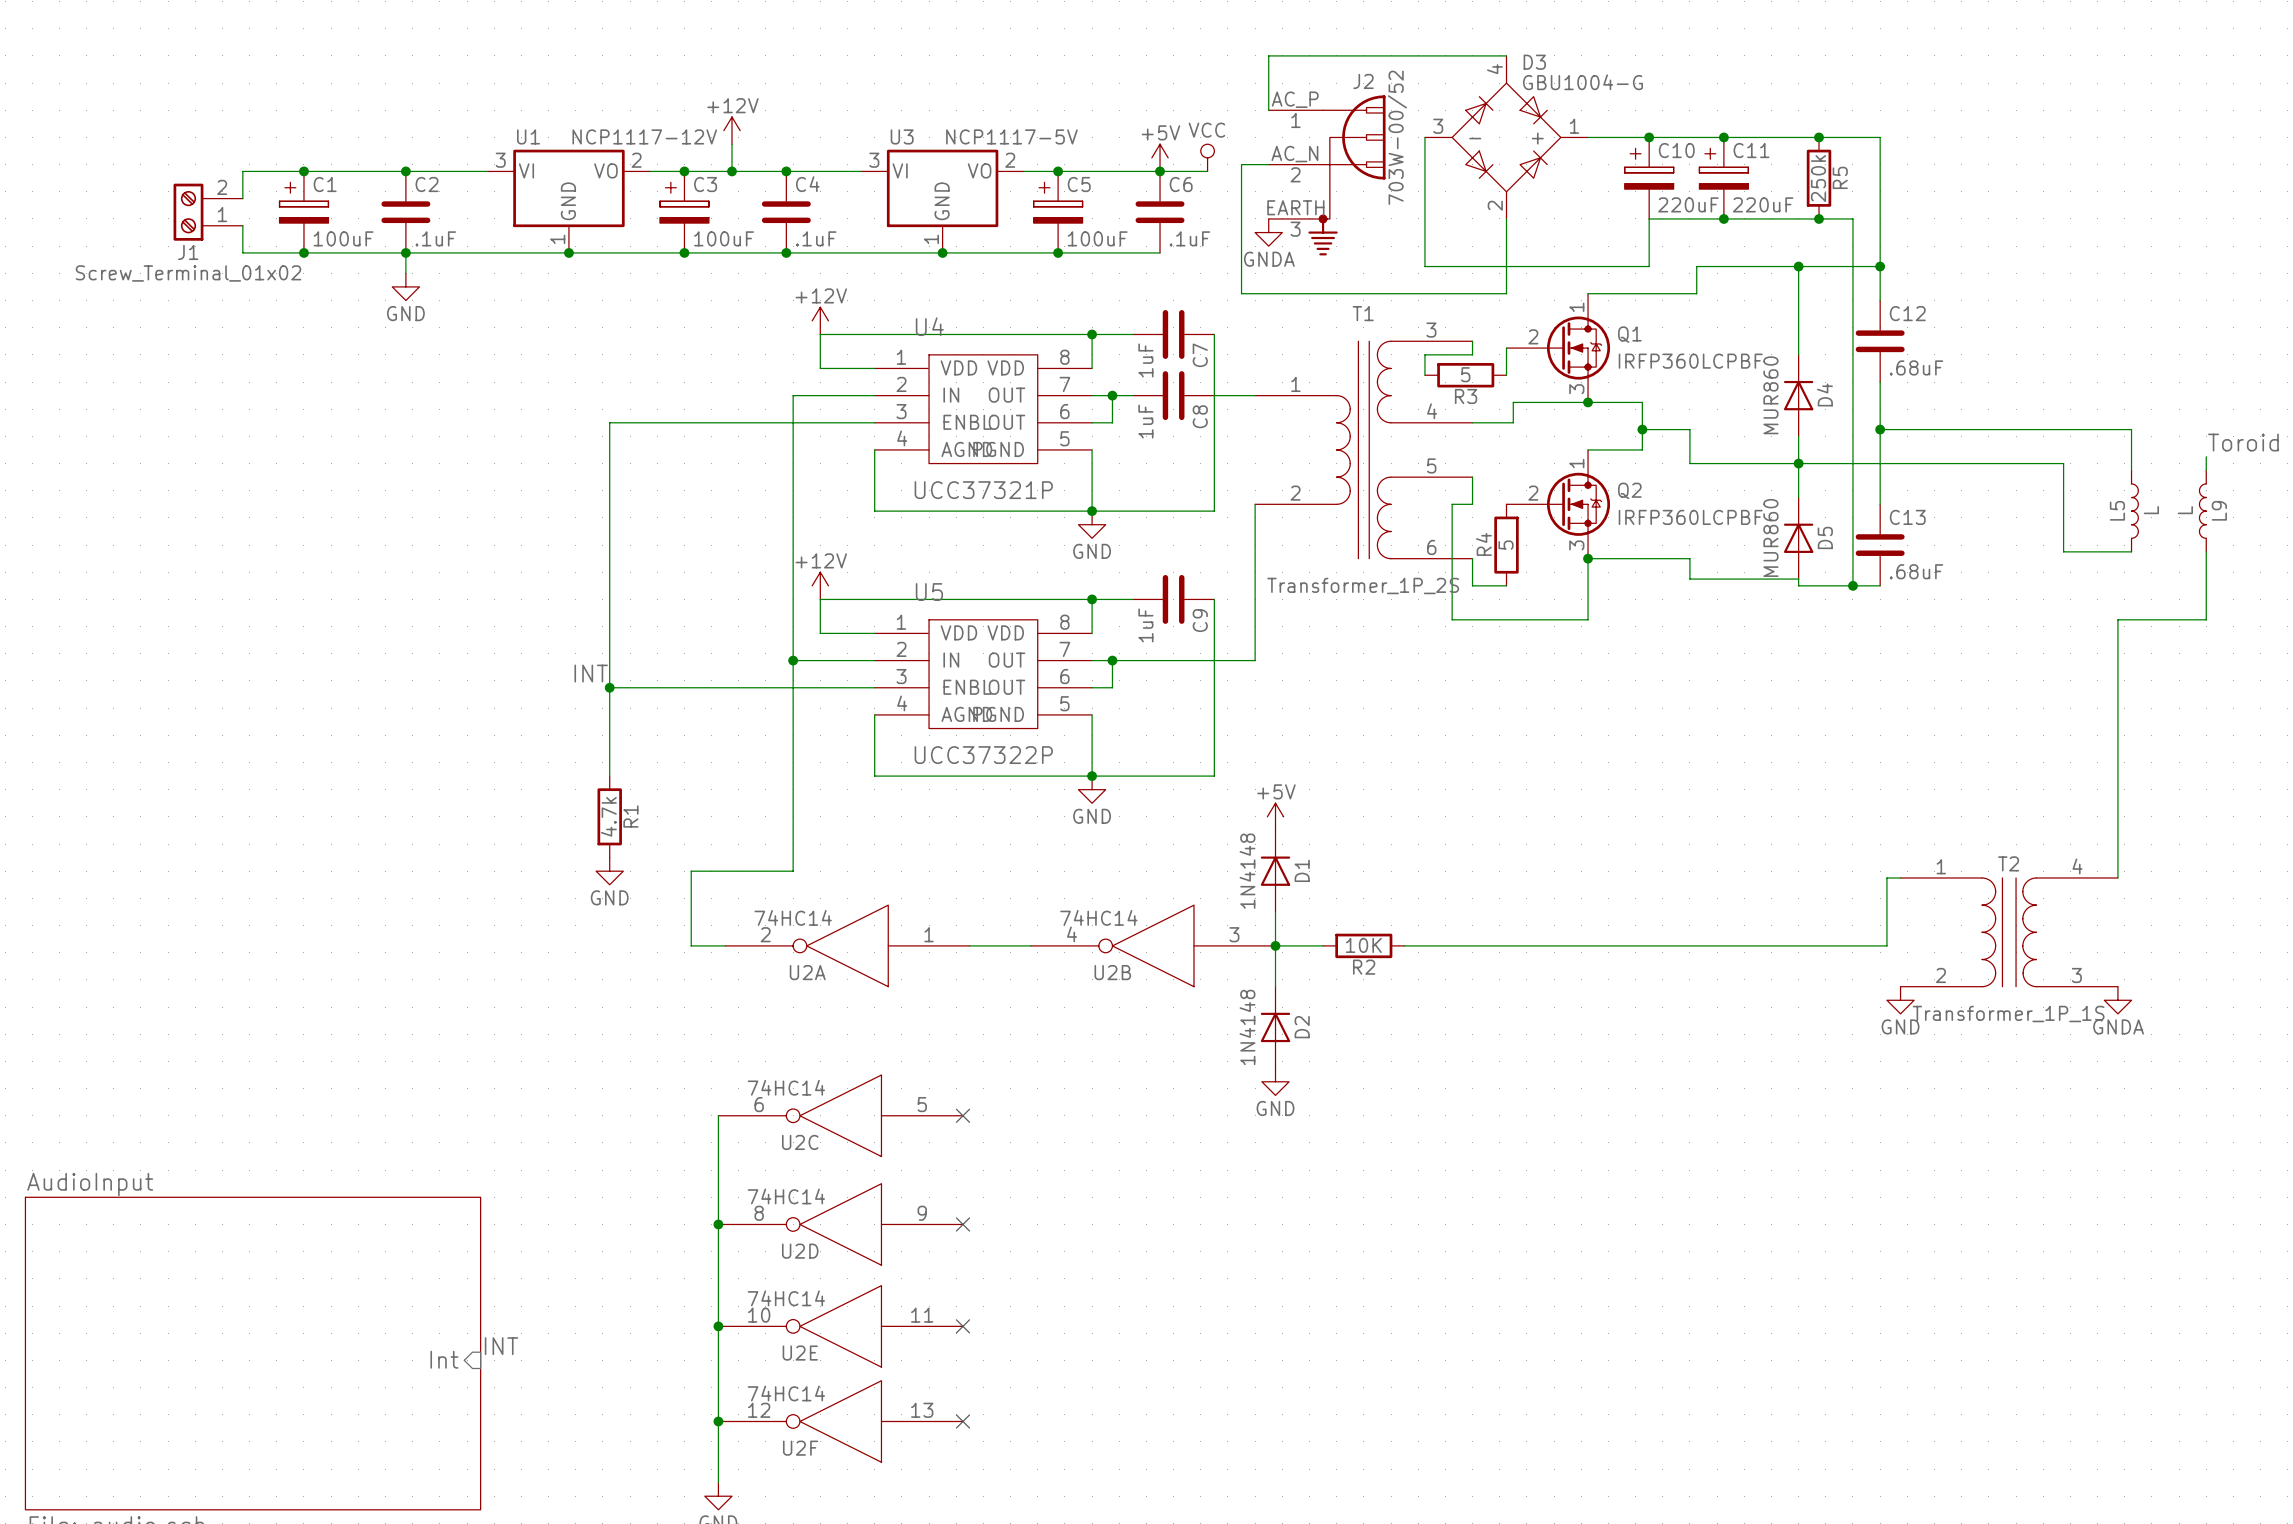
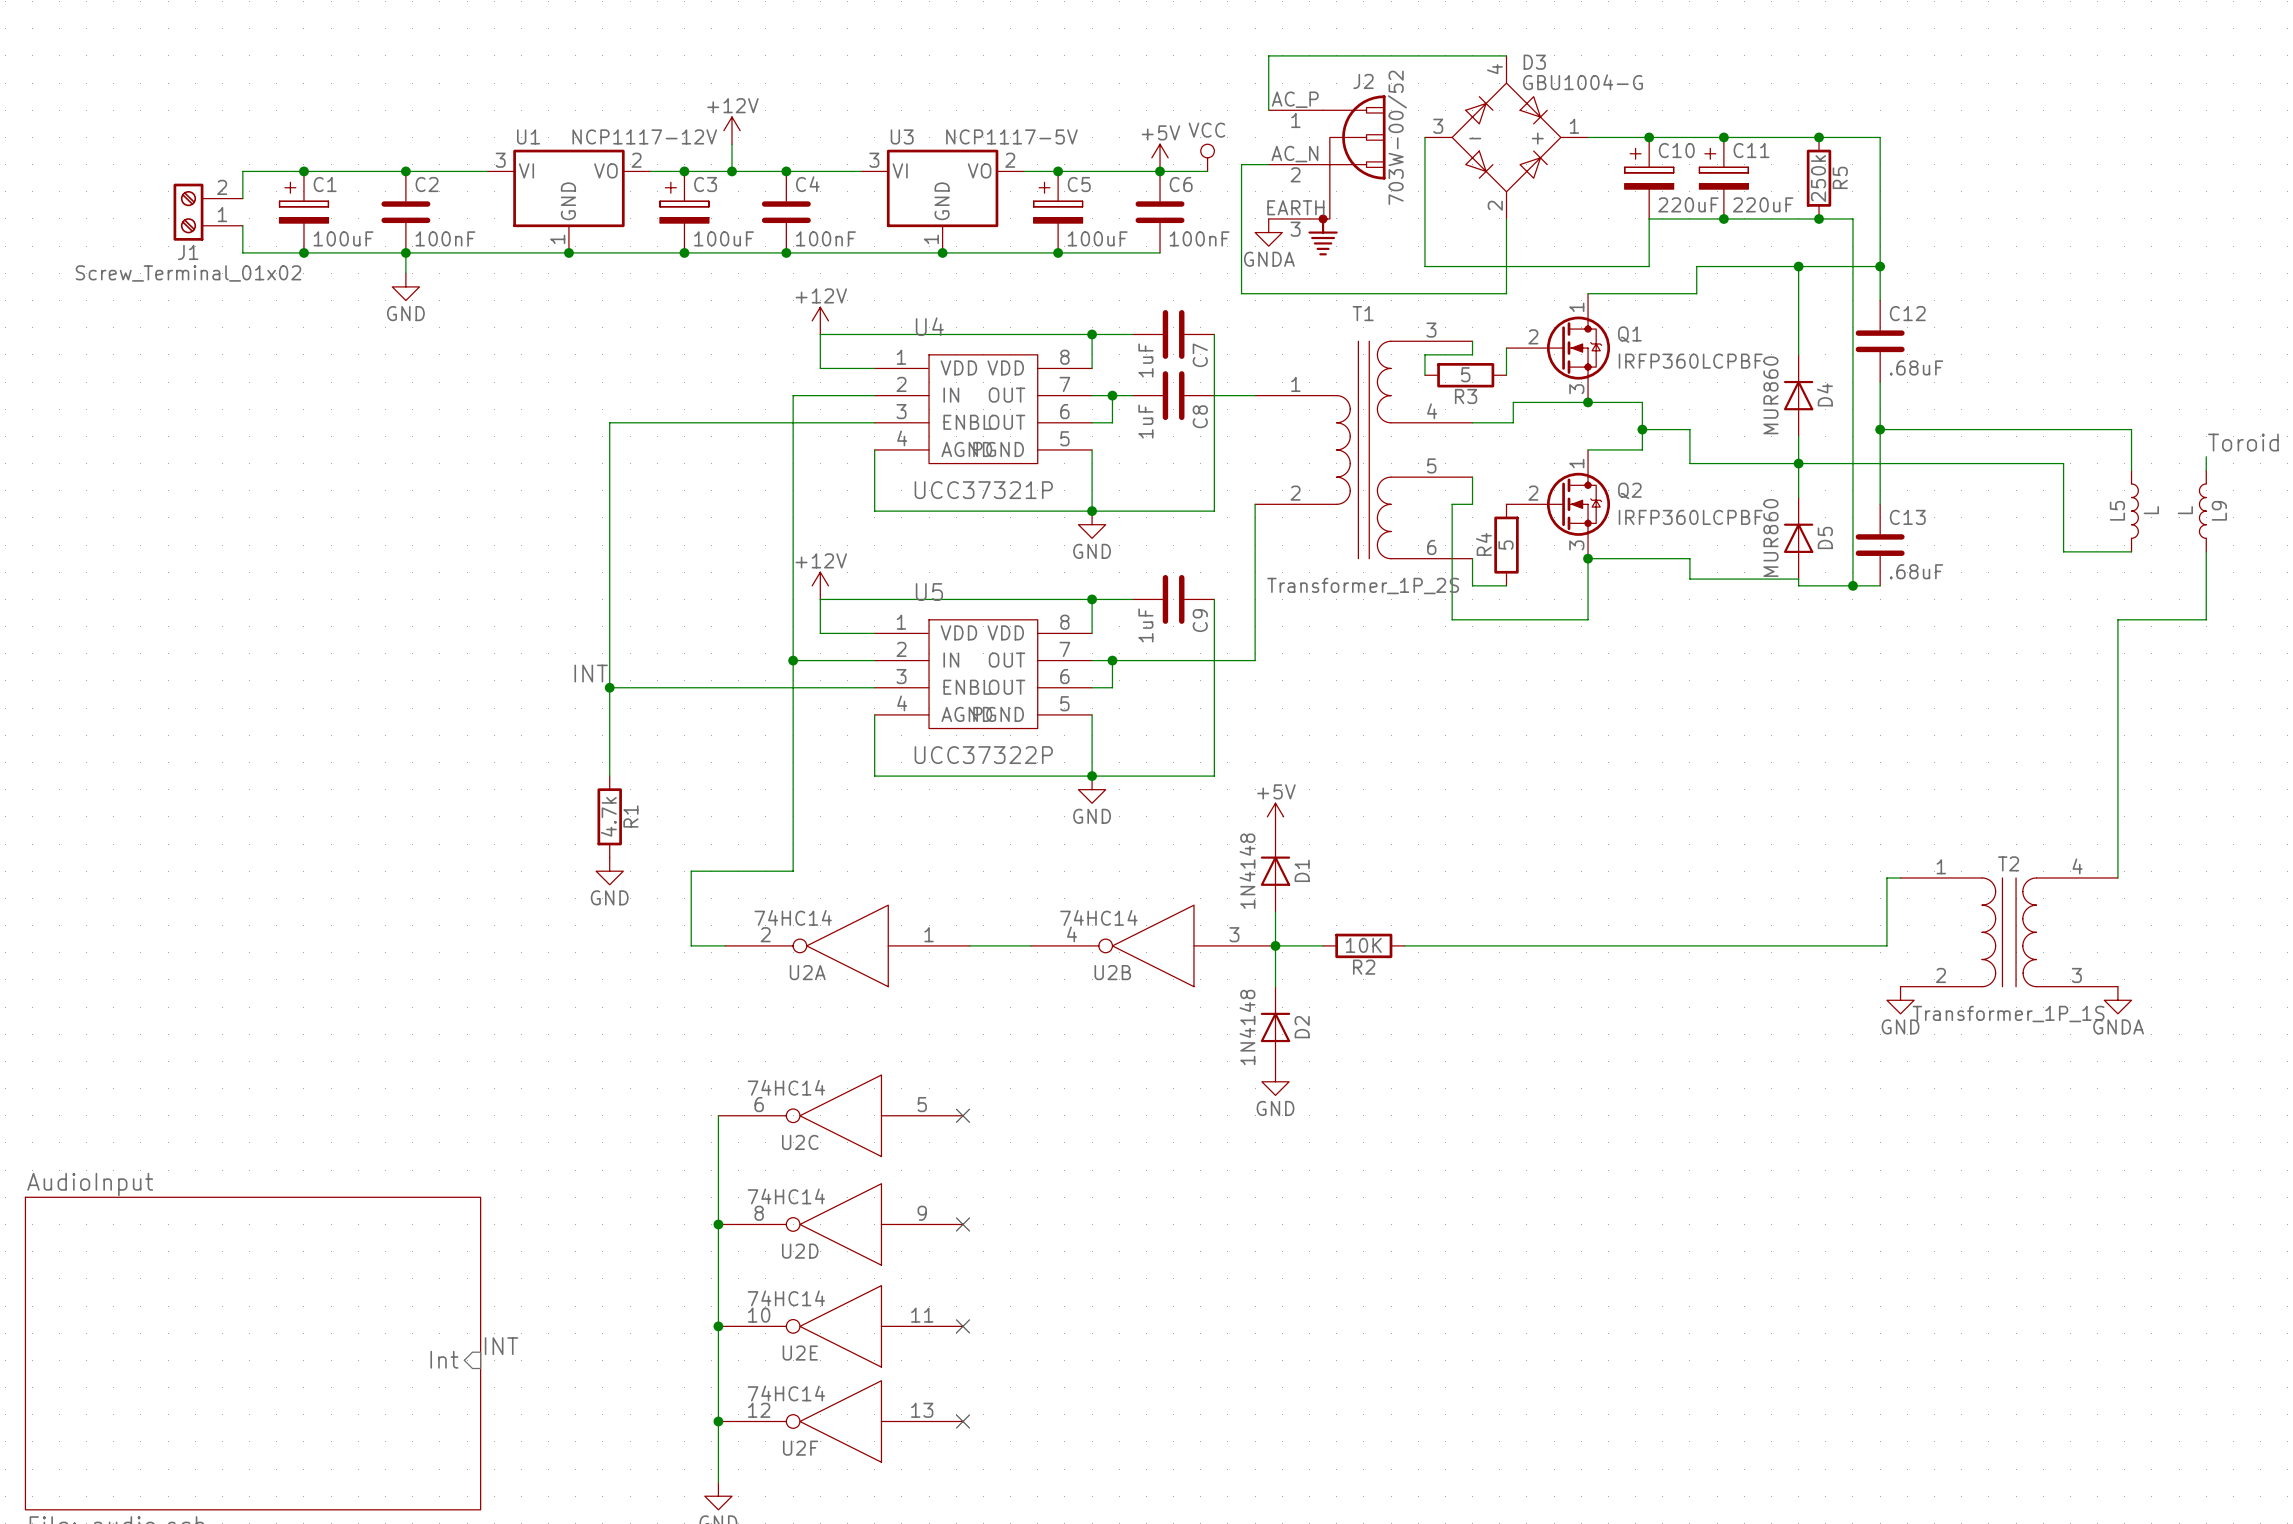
C2 value: .1uF (435, 238) -> 100nF (445, 238)
C4 value: .1uF (816, 238) -> 100nF (825, 238)
C6 value: .1uF (1189, 238) -> 100nF (1199, 238)

